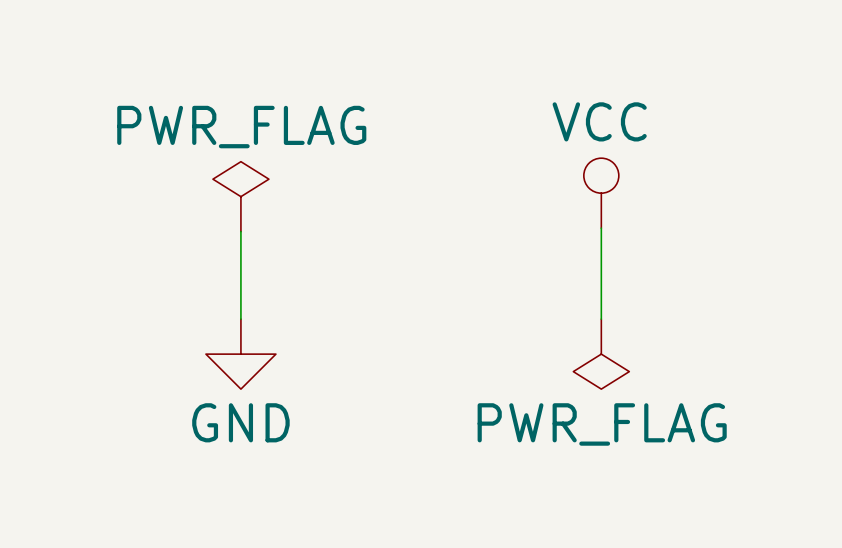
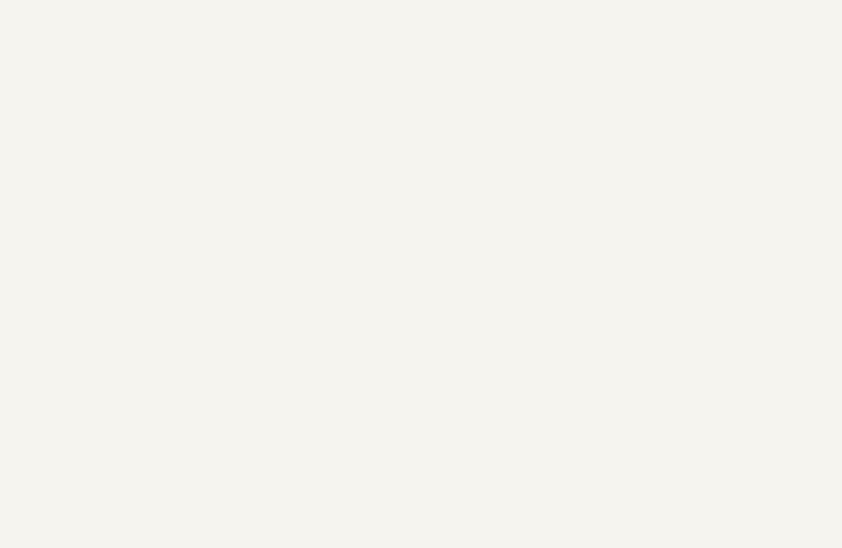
power symbol: VCC (601, 193) -> none
power symbol: PWR_FLAG (240, 196) -> none
wire: (601, 228) (601, 319) -> none
wire: (240, 231) (240, 319) -> none
power symbol: GND (240, 354) -> none
power symbol: PWR_FLAG (601, 354) -> none

